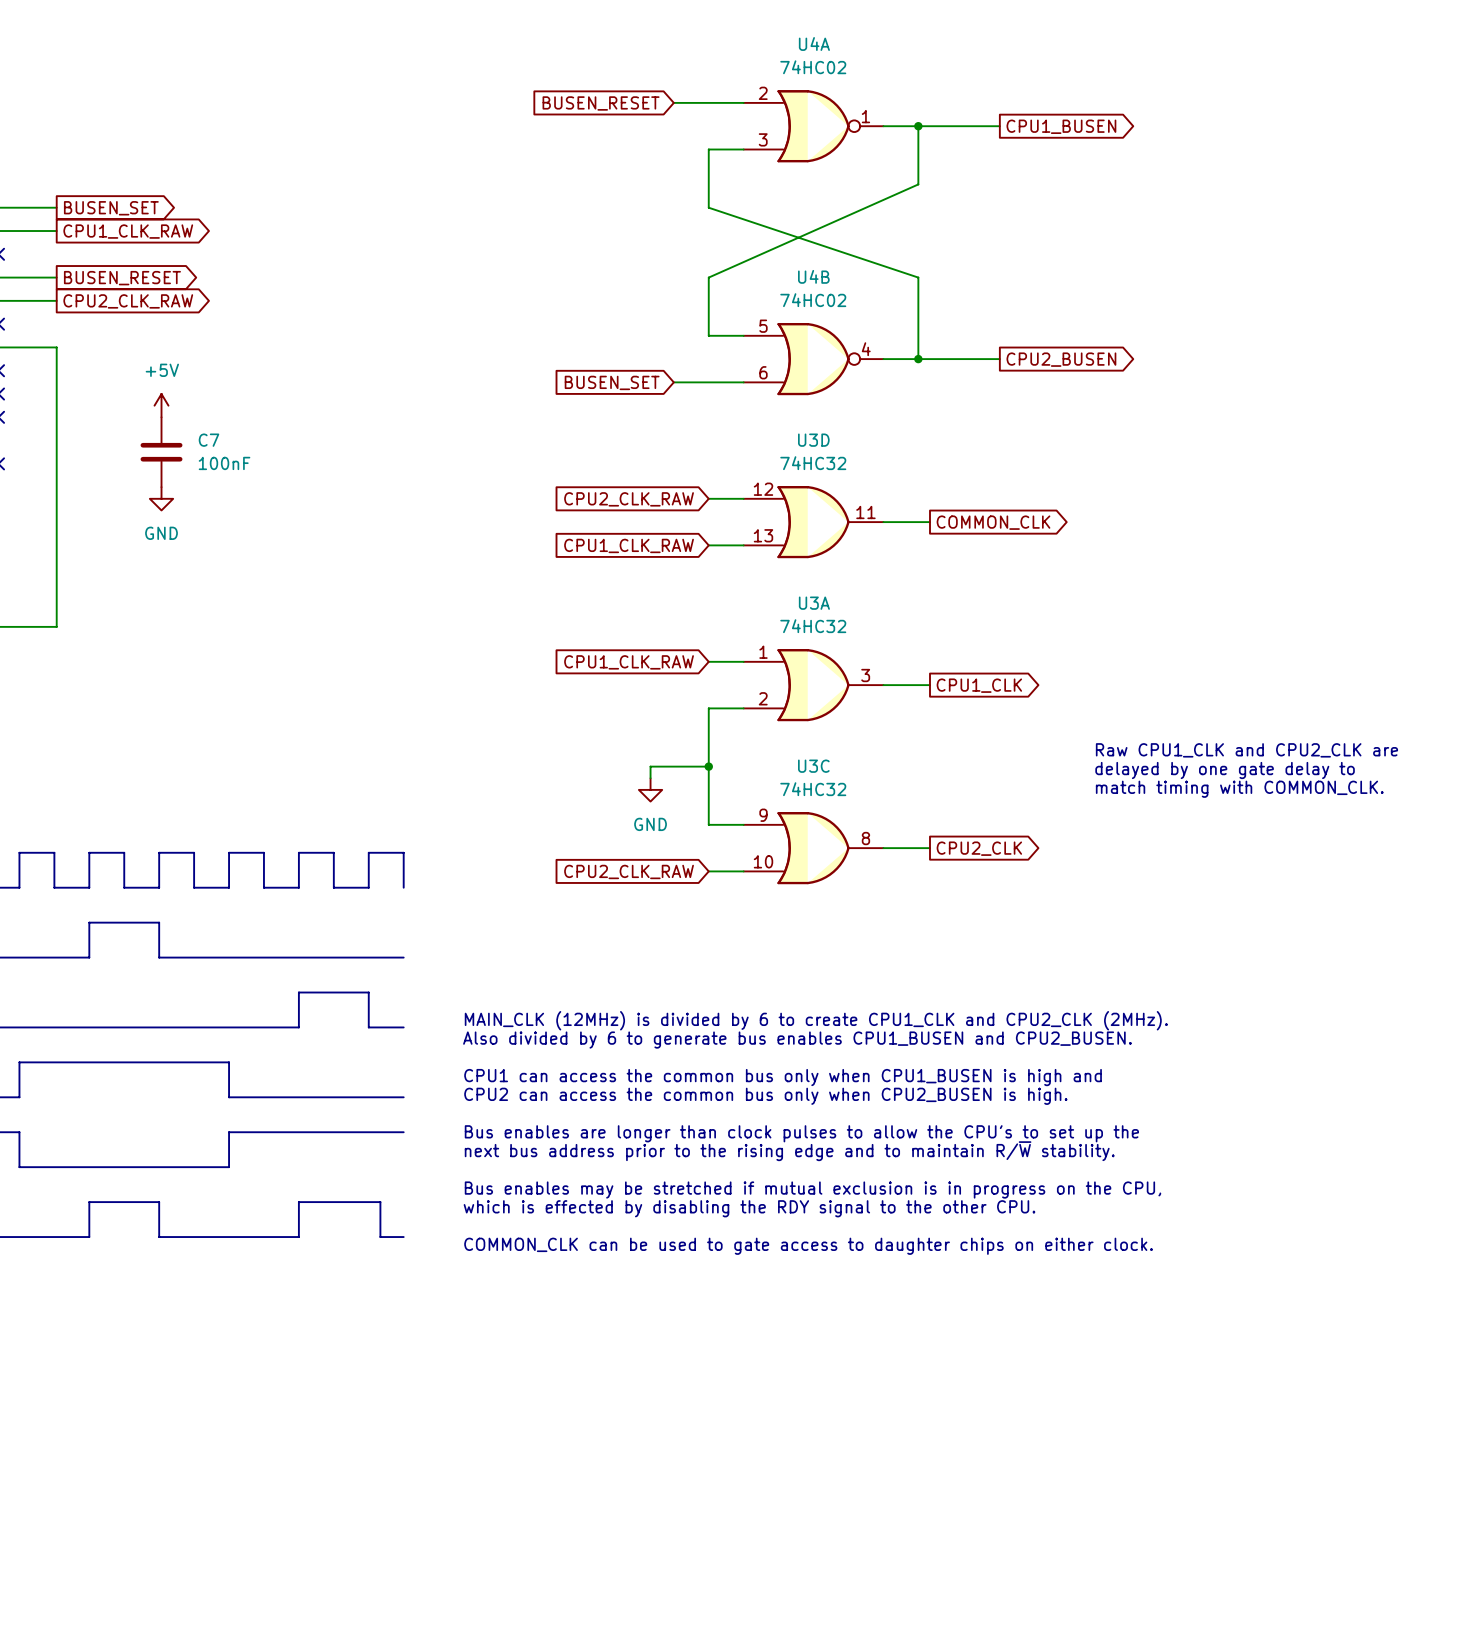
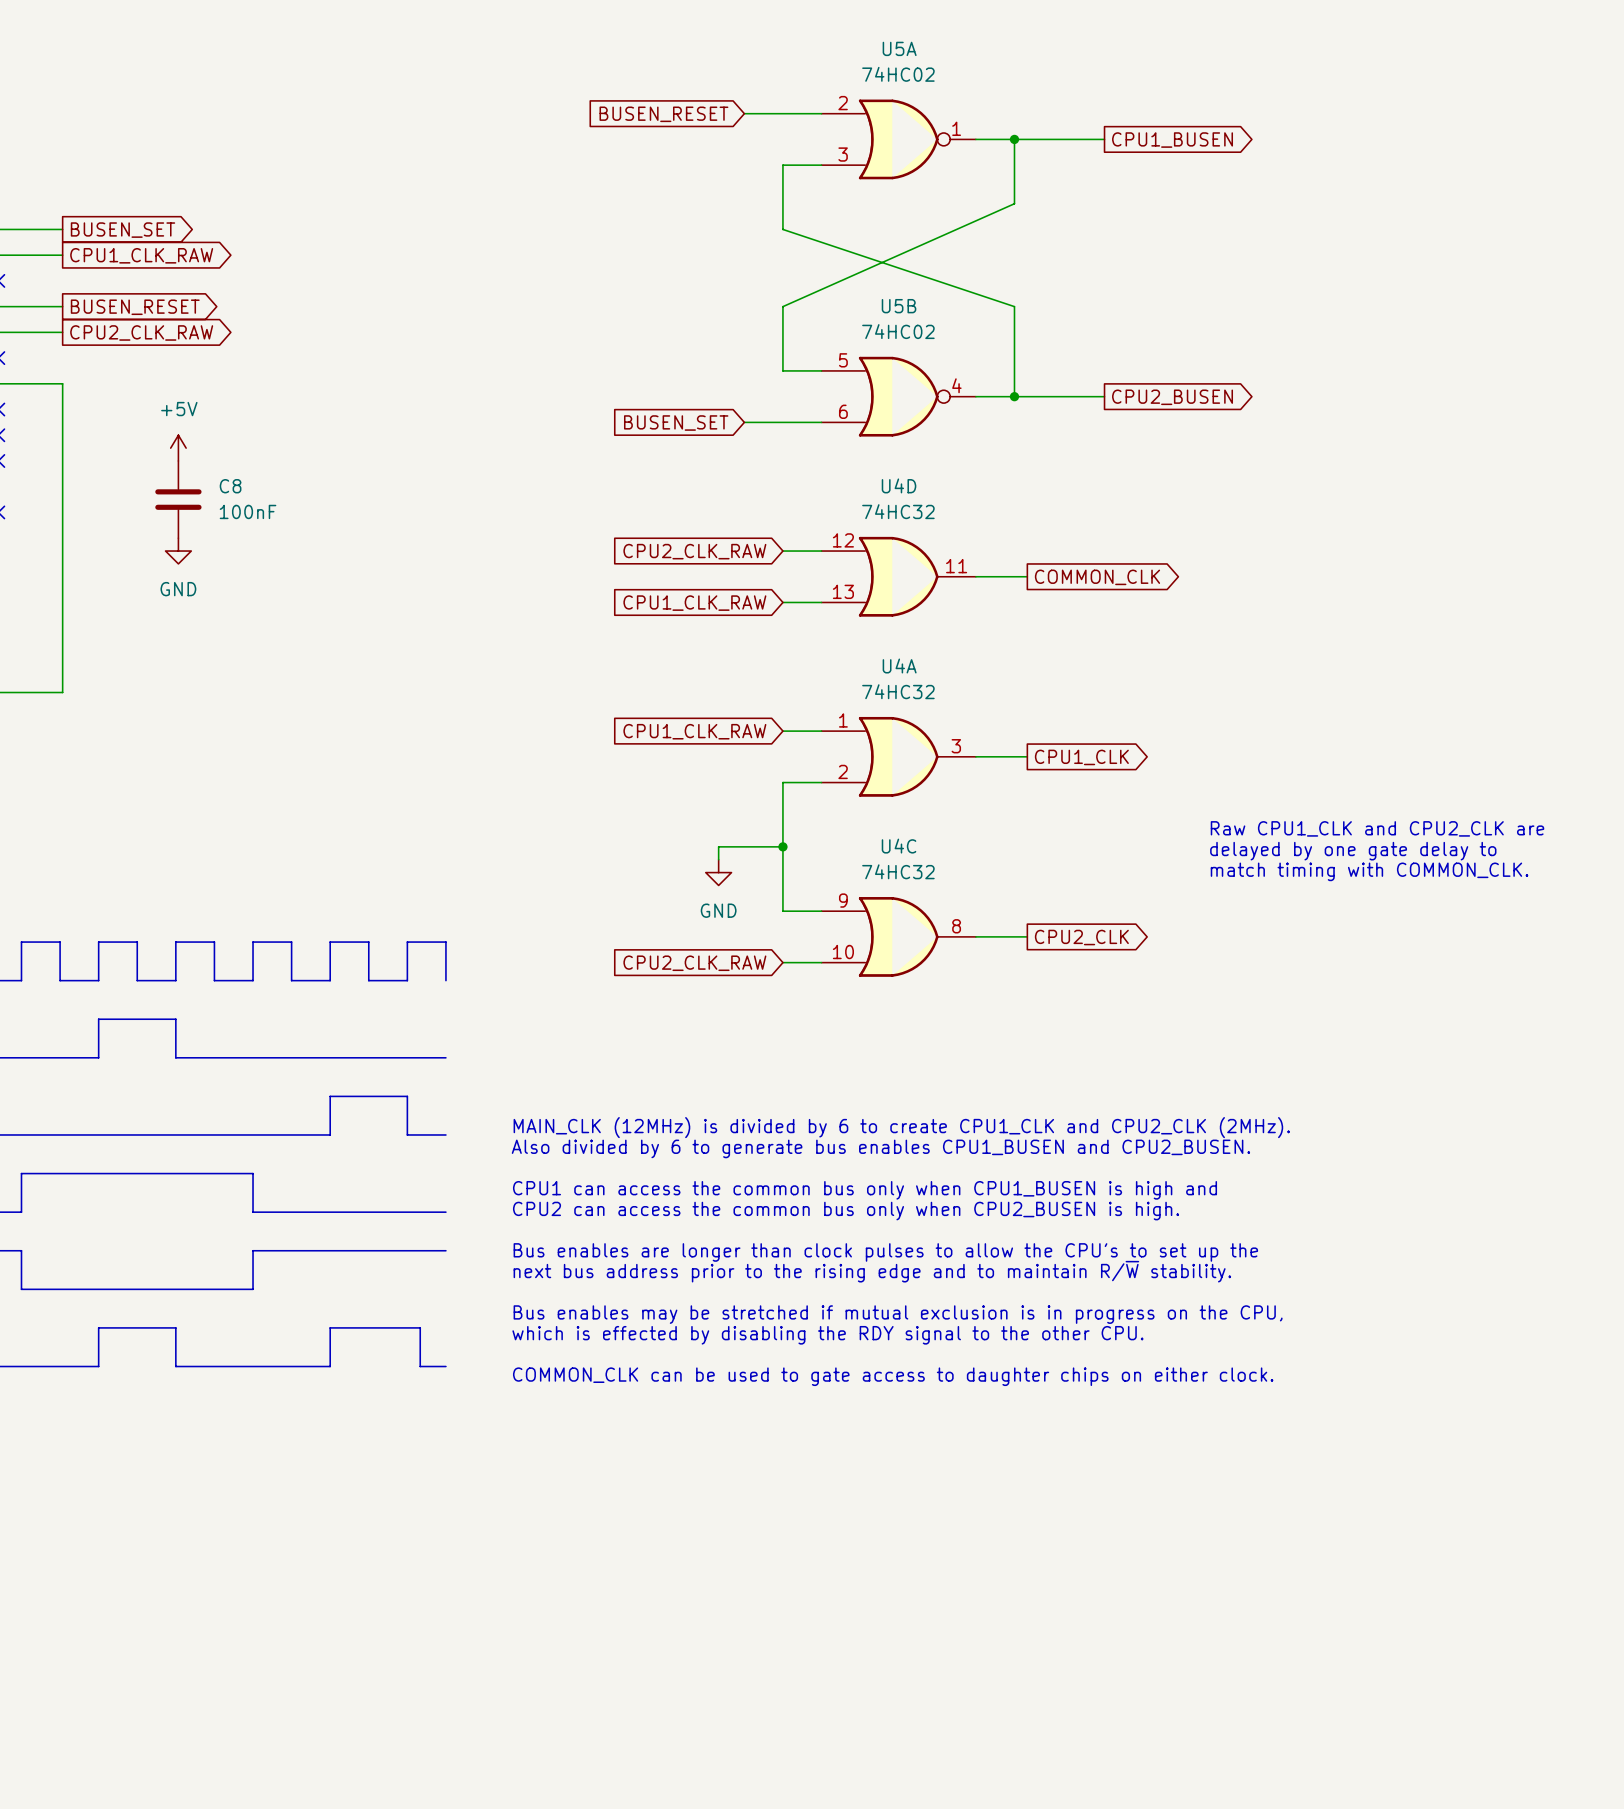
U4A name: U4A (814, 43) -> U5A (899, 48)
U4B name: U4B (813, 276) -> U5B (899, 306)
C7 name: C7 (209, 440) -> C8 (230, 486)
U3D name: U3D (813, 440) -> U4D (899, 485)
U3A name: U3A (814, 603) -> U4A (899, 666)
U3C name: U3C (813, 766) -> U4C (899, 846)

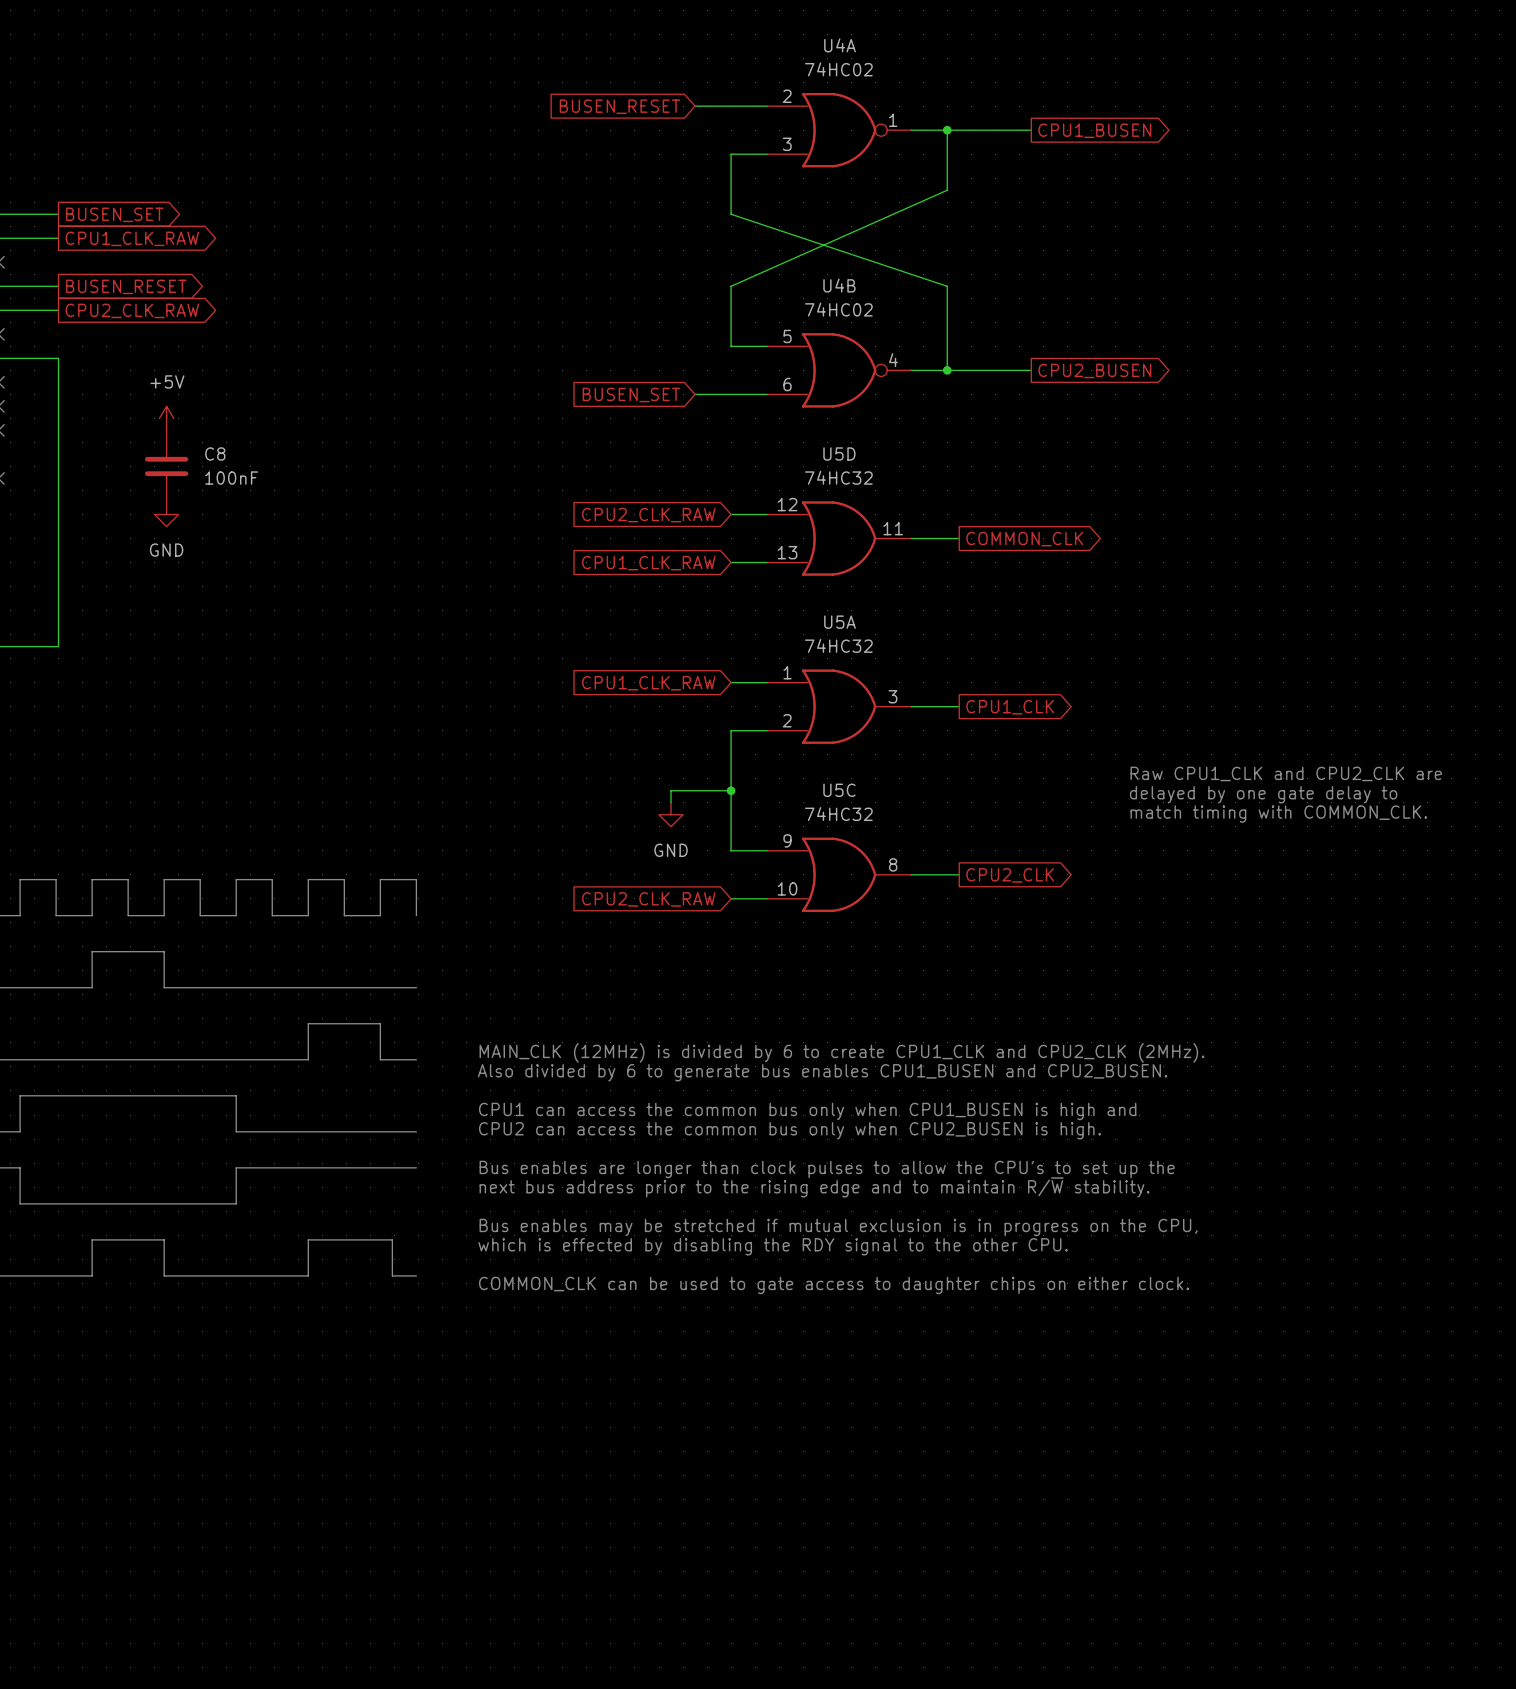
U5A name: U5A (899, 48) -> U4A (840, 45)
U5B name: U5B (899, 306) -> U4B (839, 285)
U4D name: U4D (899, 485) -> U5D (839, 454)
U4A name: U4A (899, 666) -> U5A (840, 622)
U4C name: U4C (899, 846) -> U5C (839, 790)

